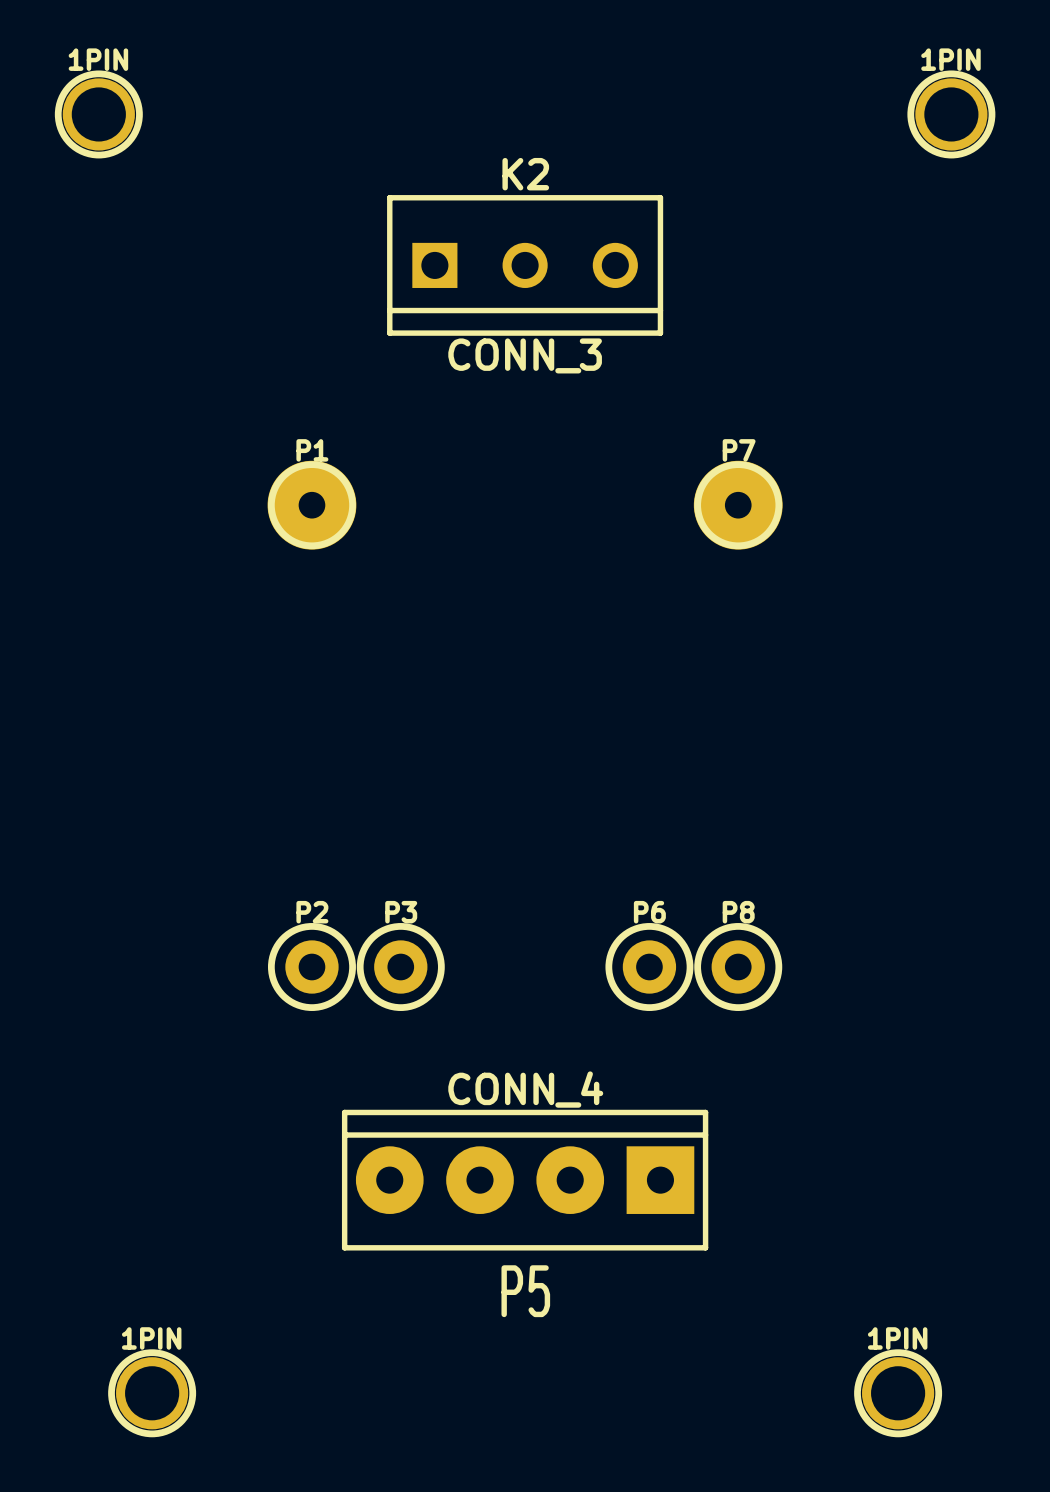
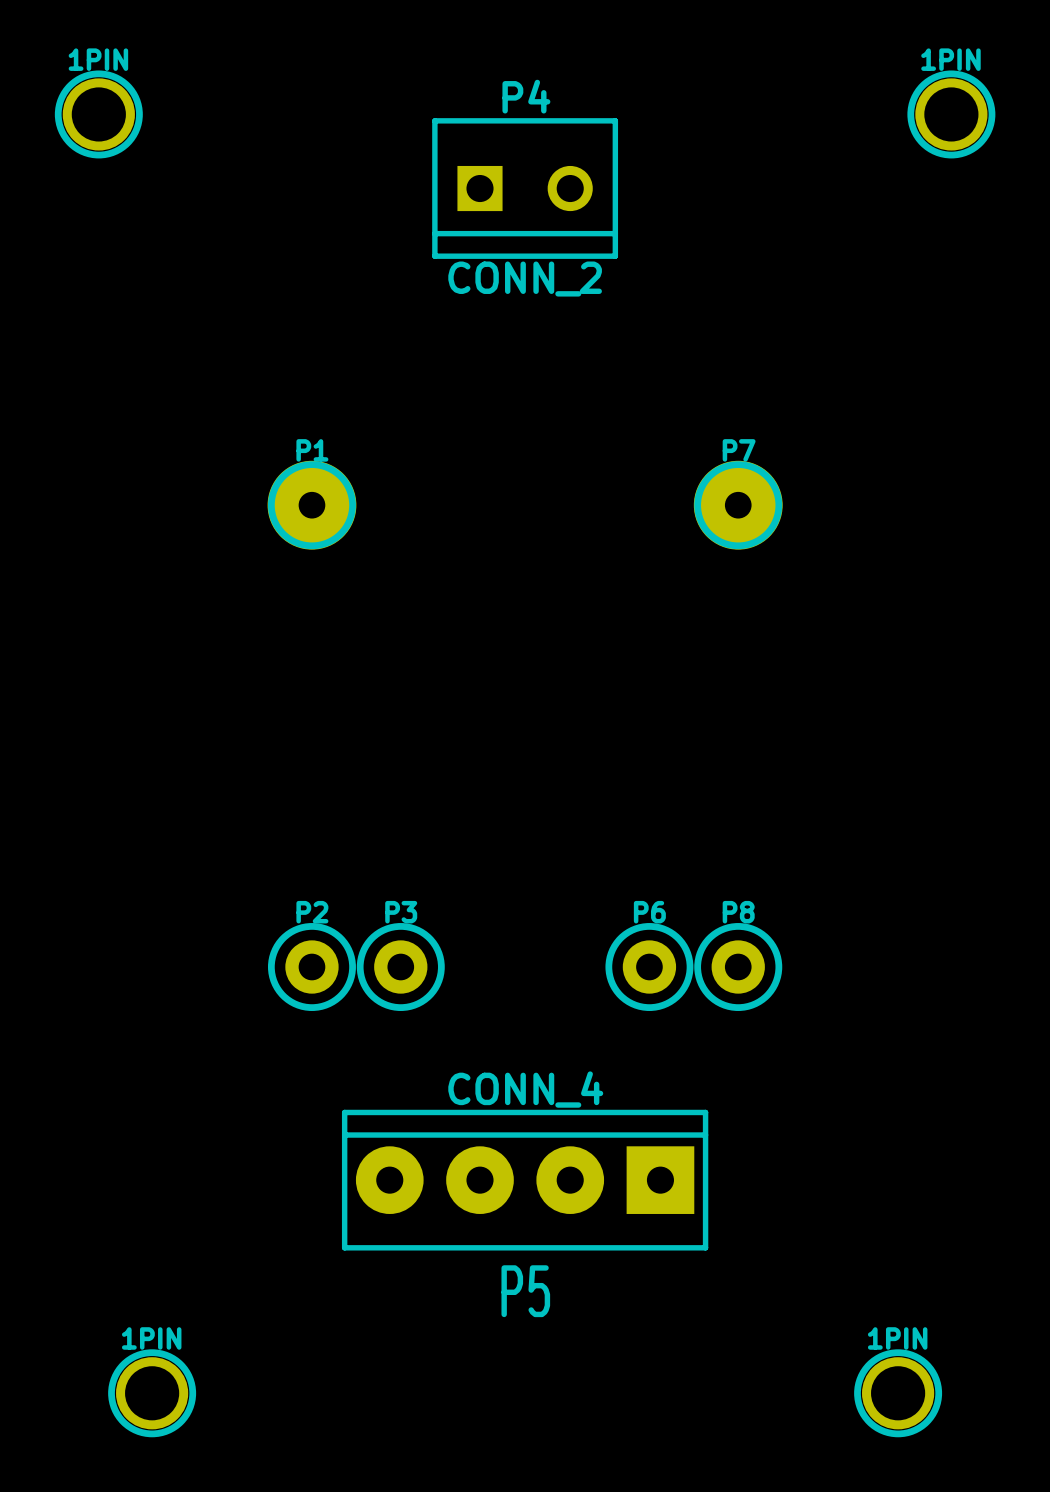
P4: none -> CONN_2 (525, 188)
K2: CONN_3 (525, 265) -> none

